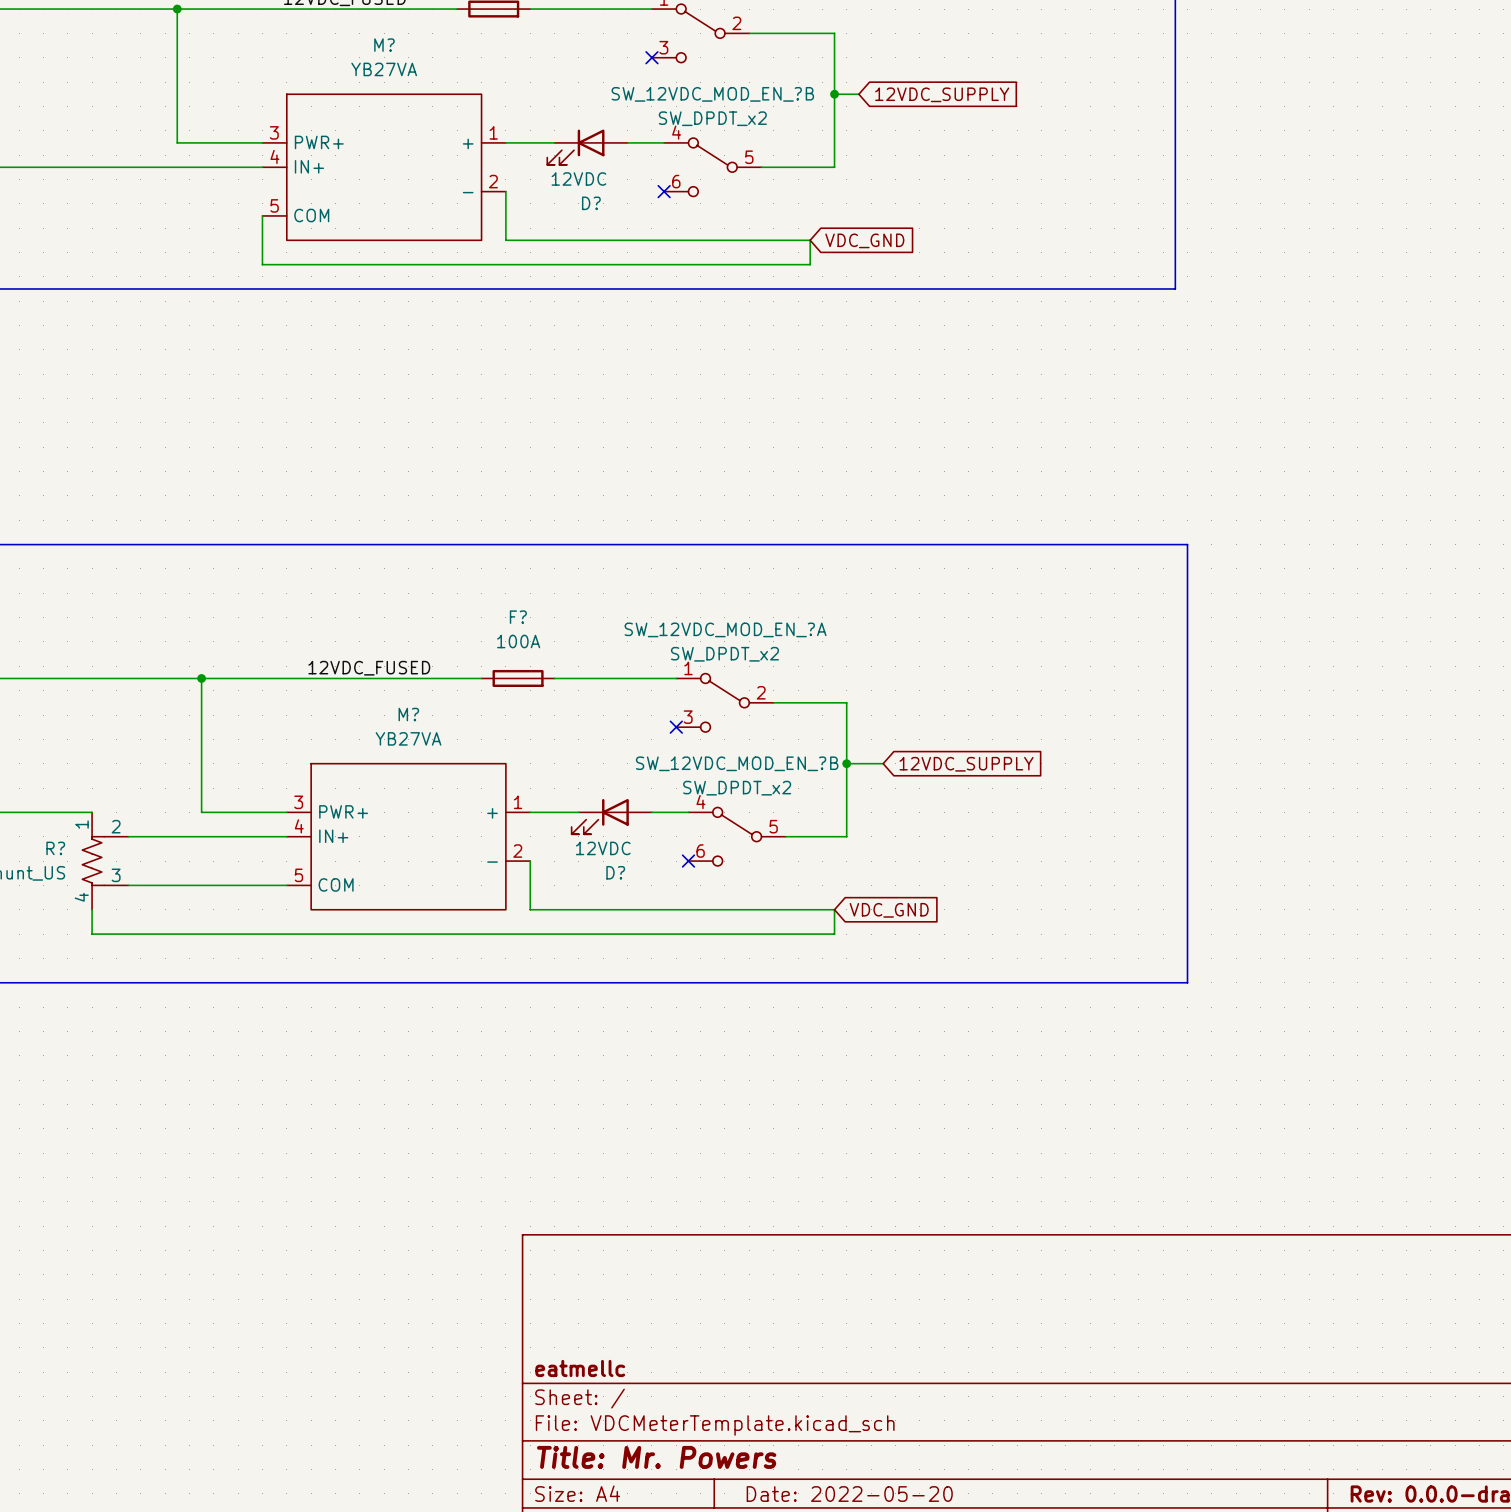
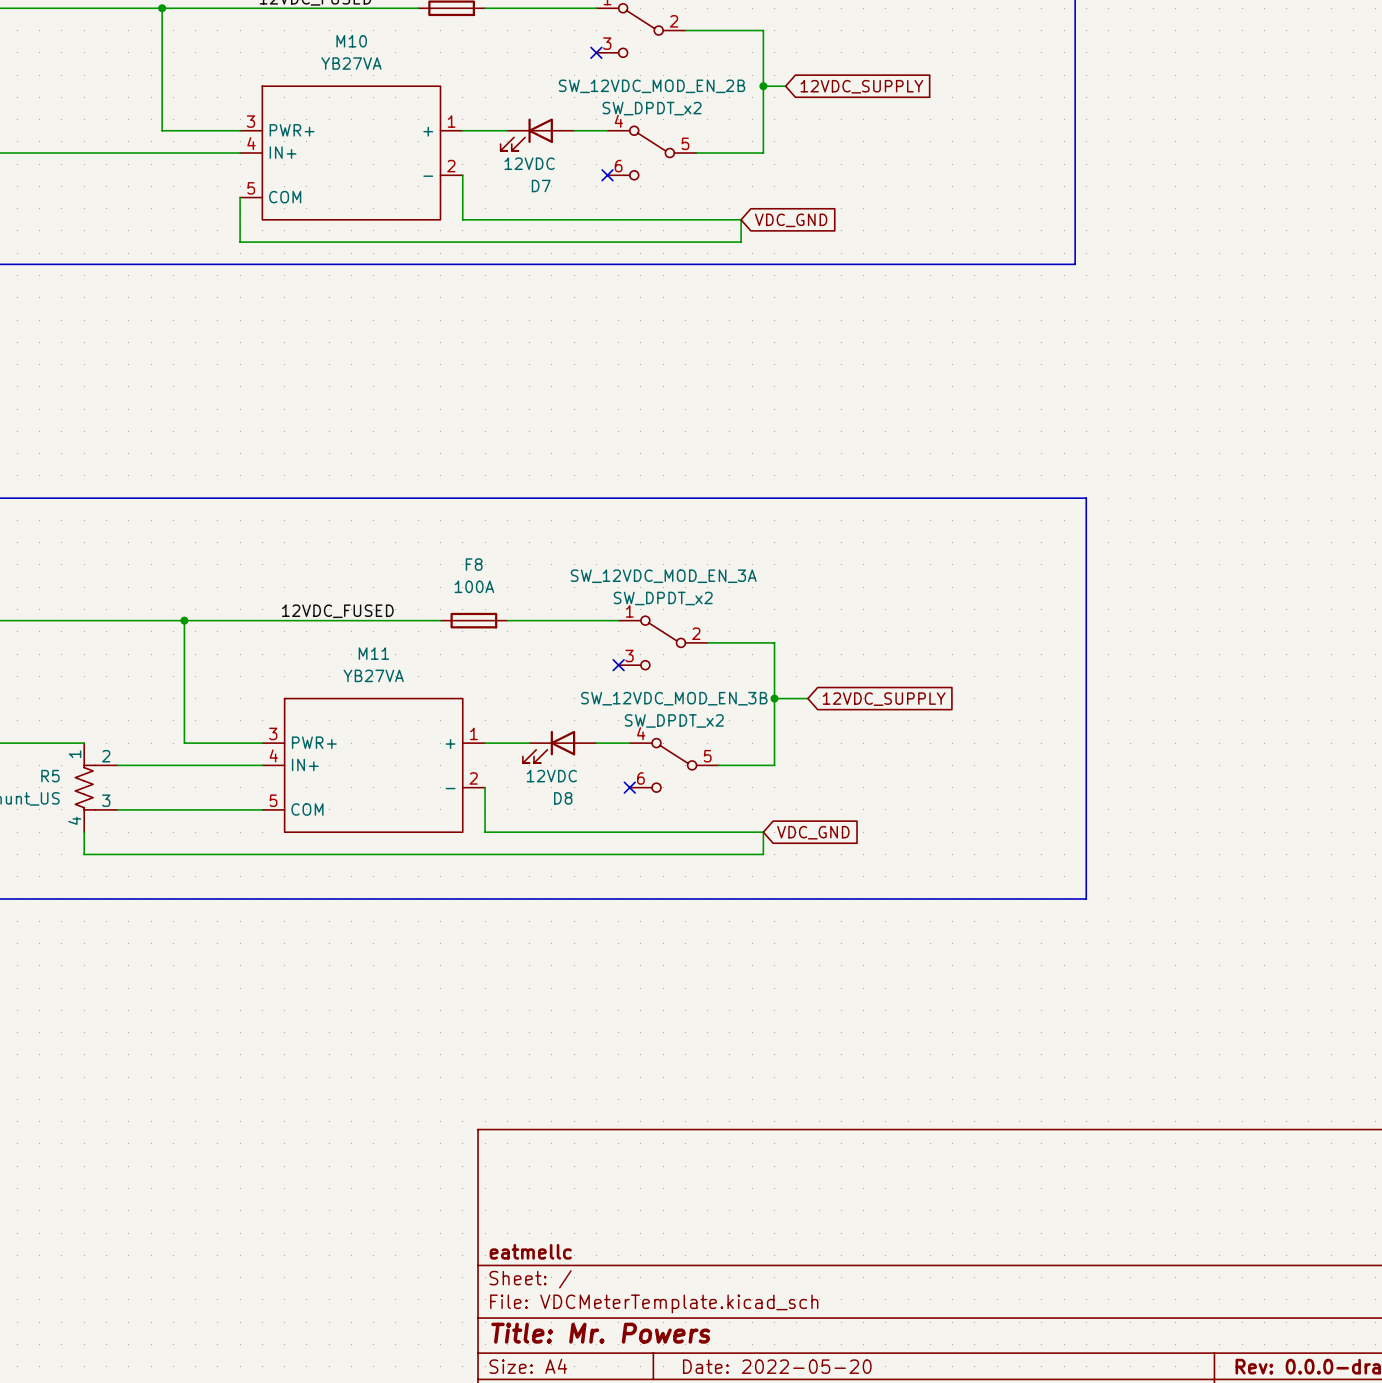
M? name: M? (384, 45) -> M10 (351, 41)
SW_12VDC_MOD_EN_?B name: SW_12VDC_MOD_EN_?B (712, 94) -> SW_12VDC_MOD_EN_2B (652, 86)
D? name: D? (591, 203) -> D7 (541, 186)
F? name: F? (518, 617) -> F8 (474, 564)
SW_12VDC_MOD_EN_?A name: SW_12VDC_MOD_EN_?A (725, 629) -> SW_12VDC_MOD_EN_3A (663, 576)
M? name: M? (408, 714) -> M11 (373, 653)
SW_12VDC_MOD_EN_?B name: SW_12VDC_MOD_EN_?B (737, 763) -> SW_12VDC_MOD_EN_3B (674, 698)
R? name: R? (55, 848) -> R5 (50, 776)
D? name: D? (615, 872) -> D8 (563, 798)

